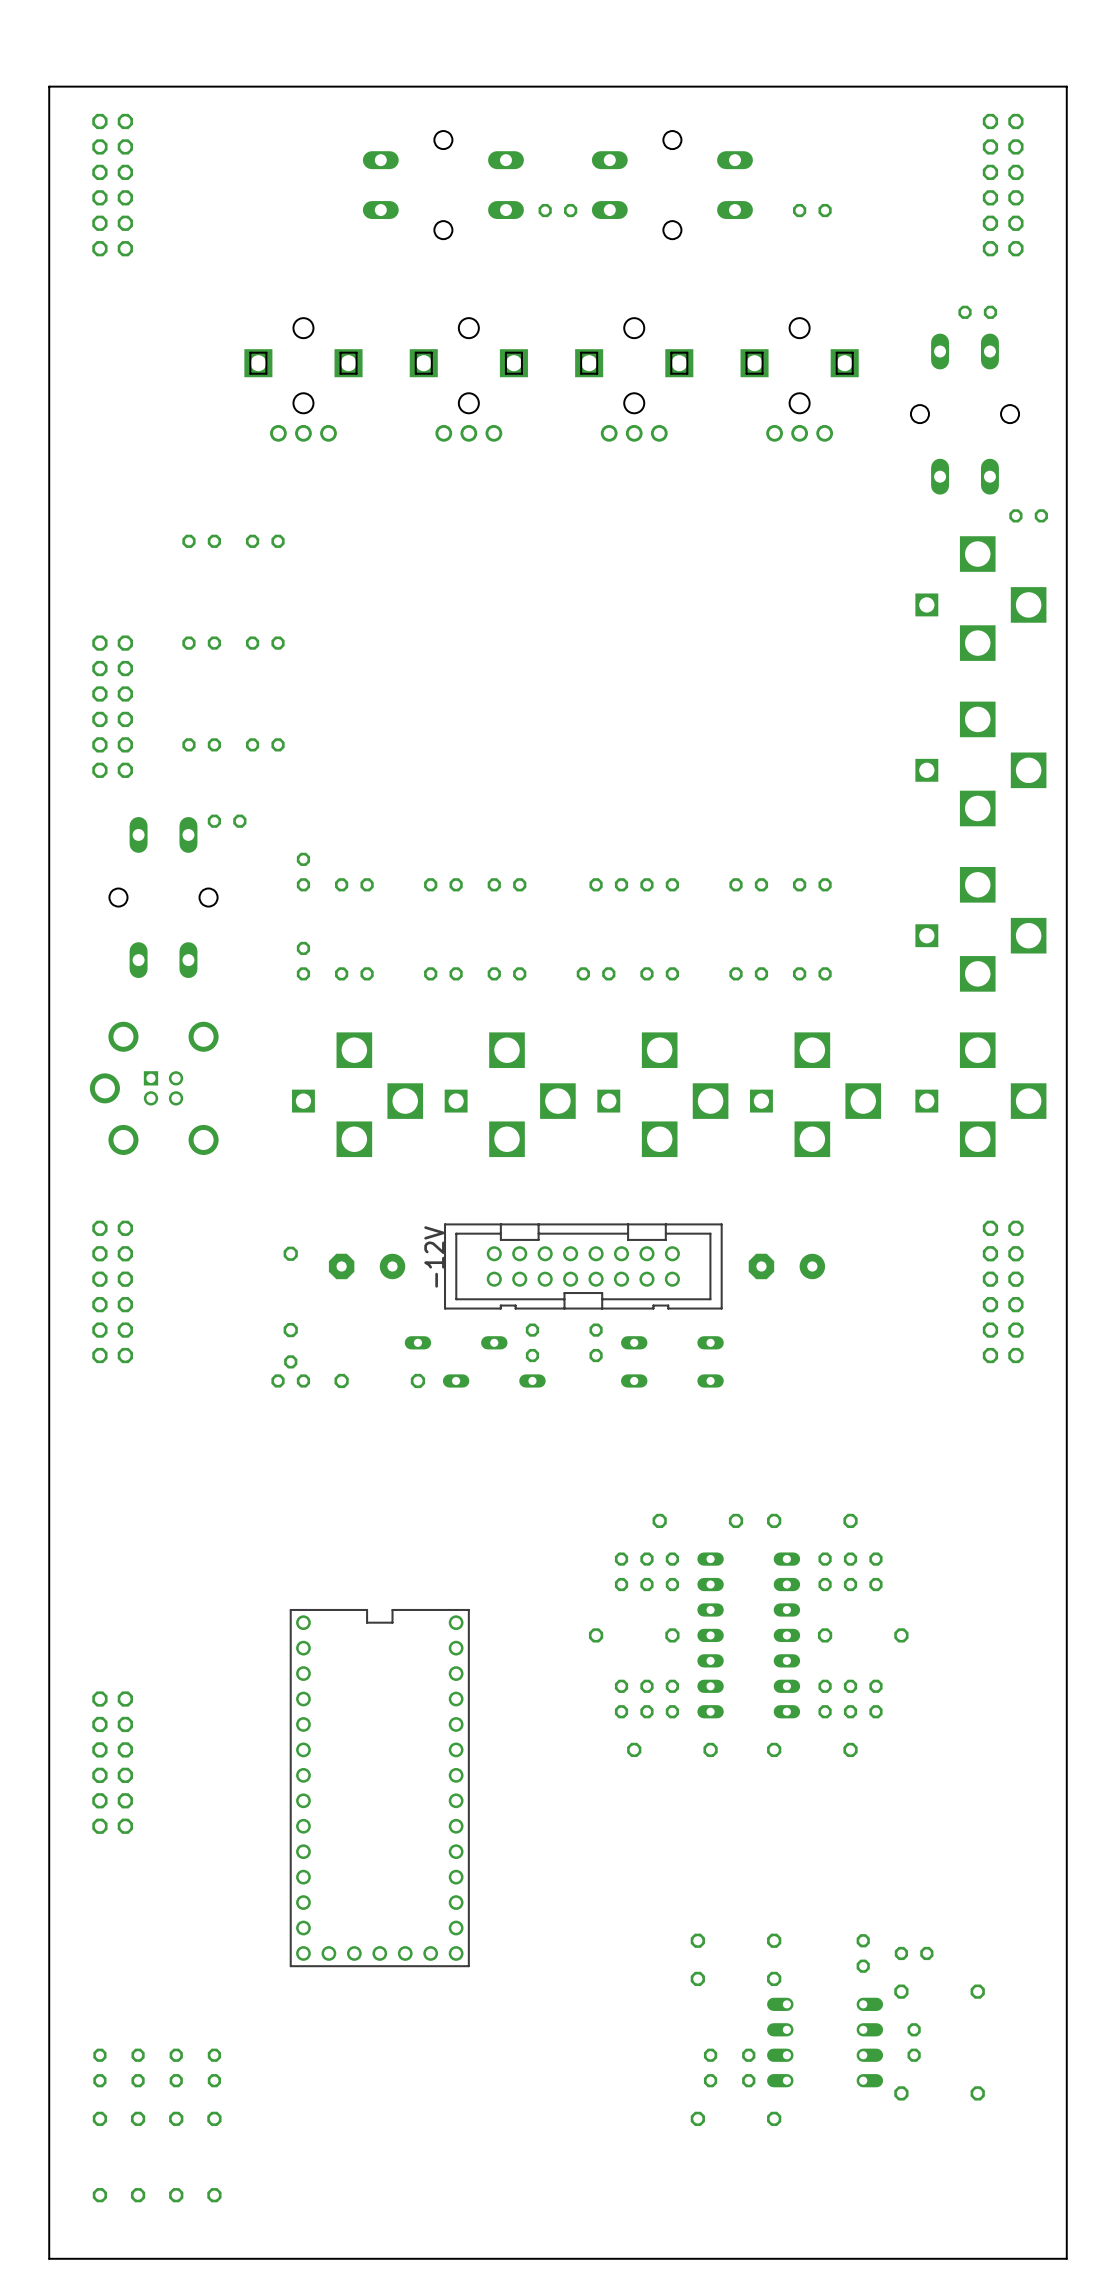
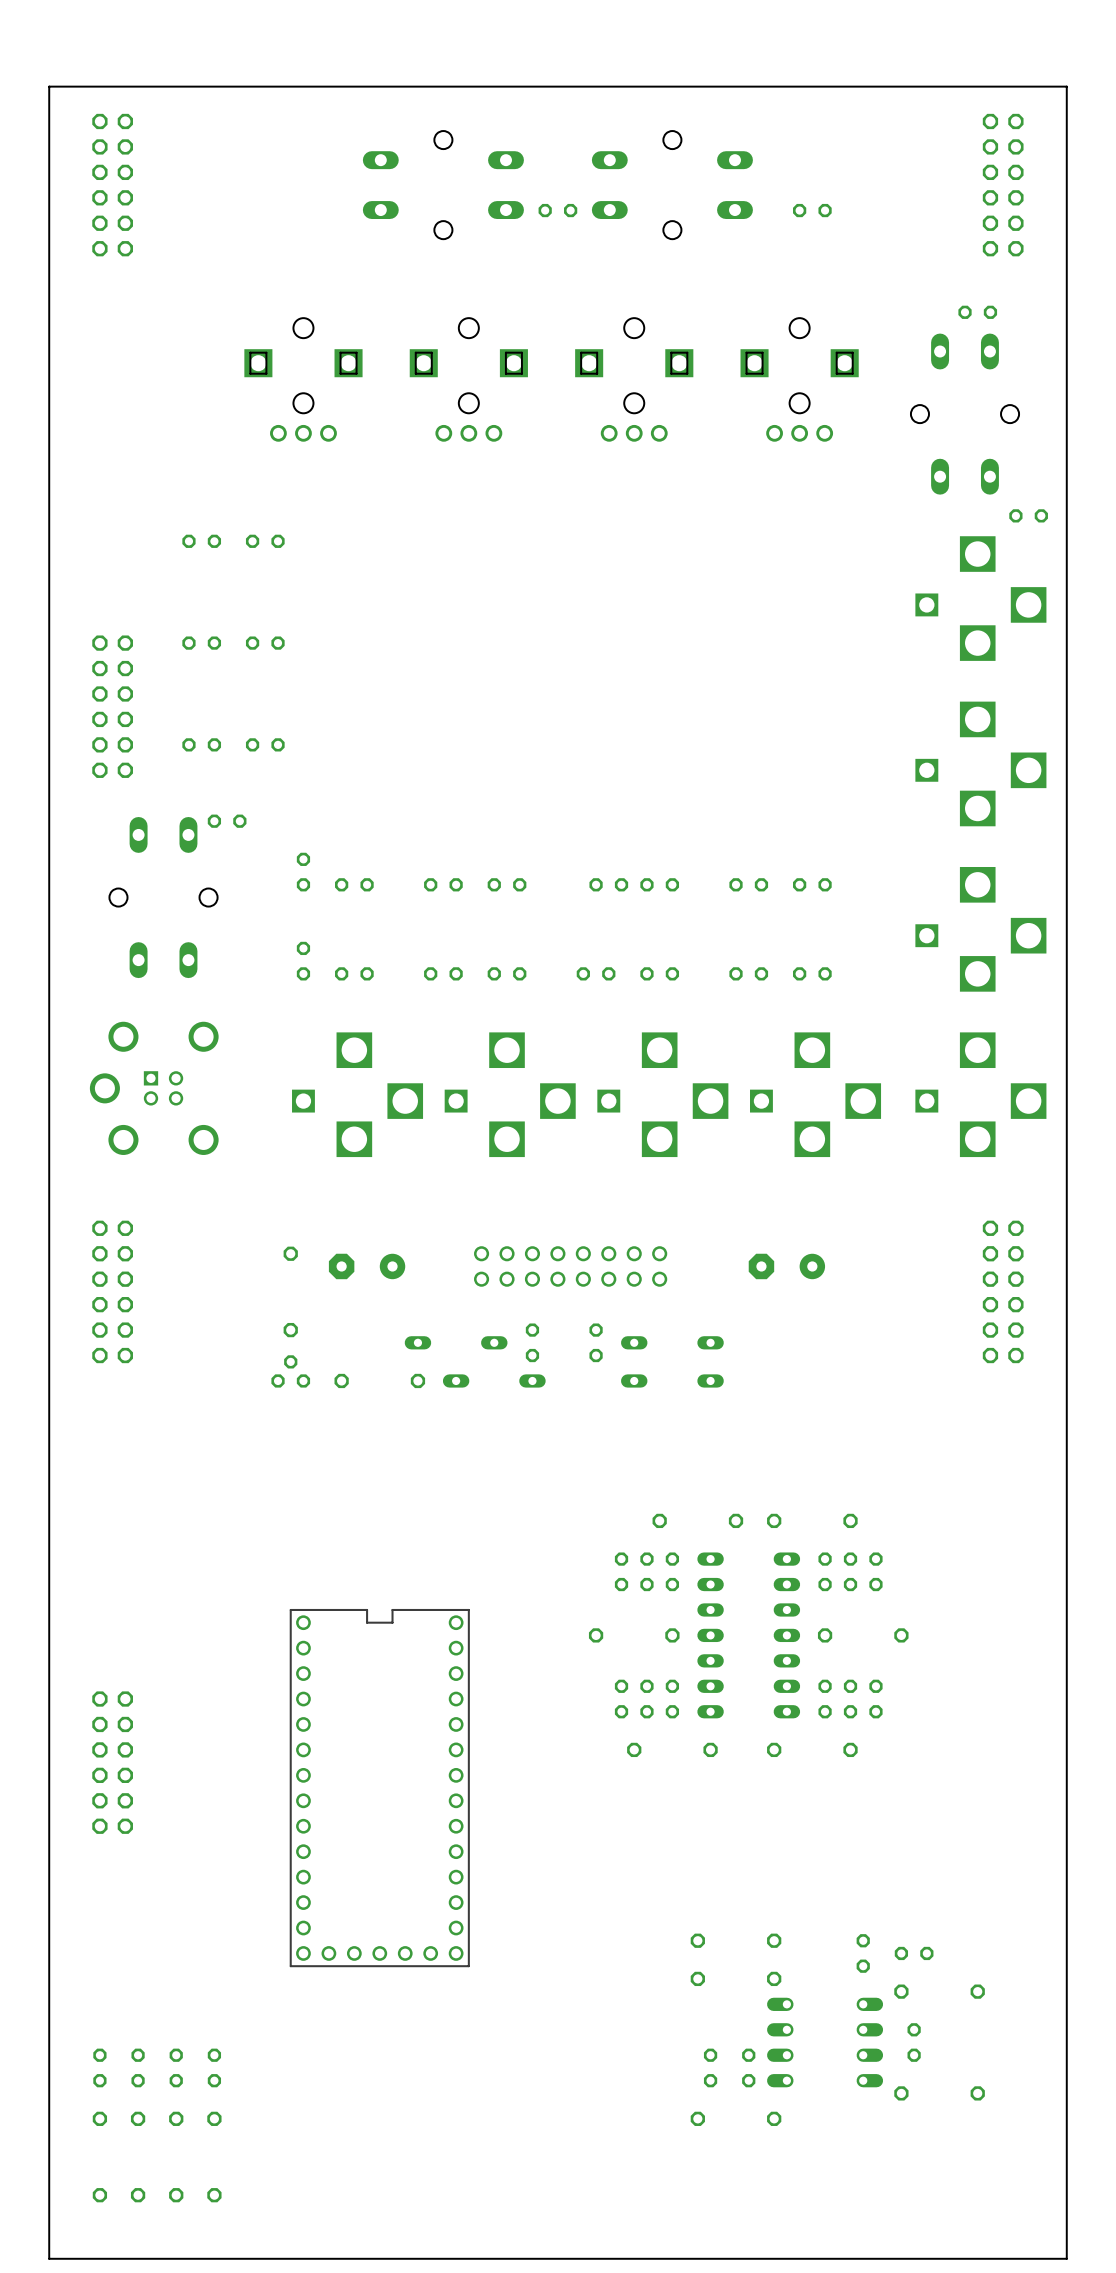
text: -12V (434, 1256) -> none
part side: bottom (583, 1266) -> top (570, 1266)

